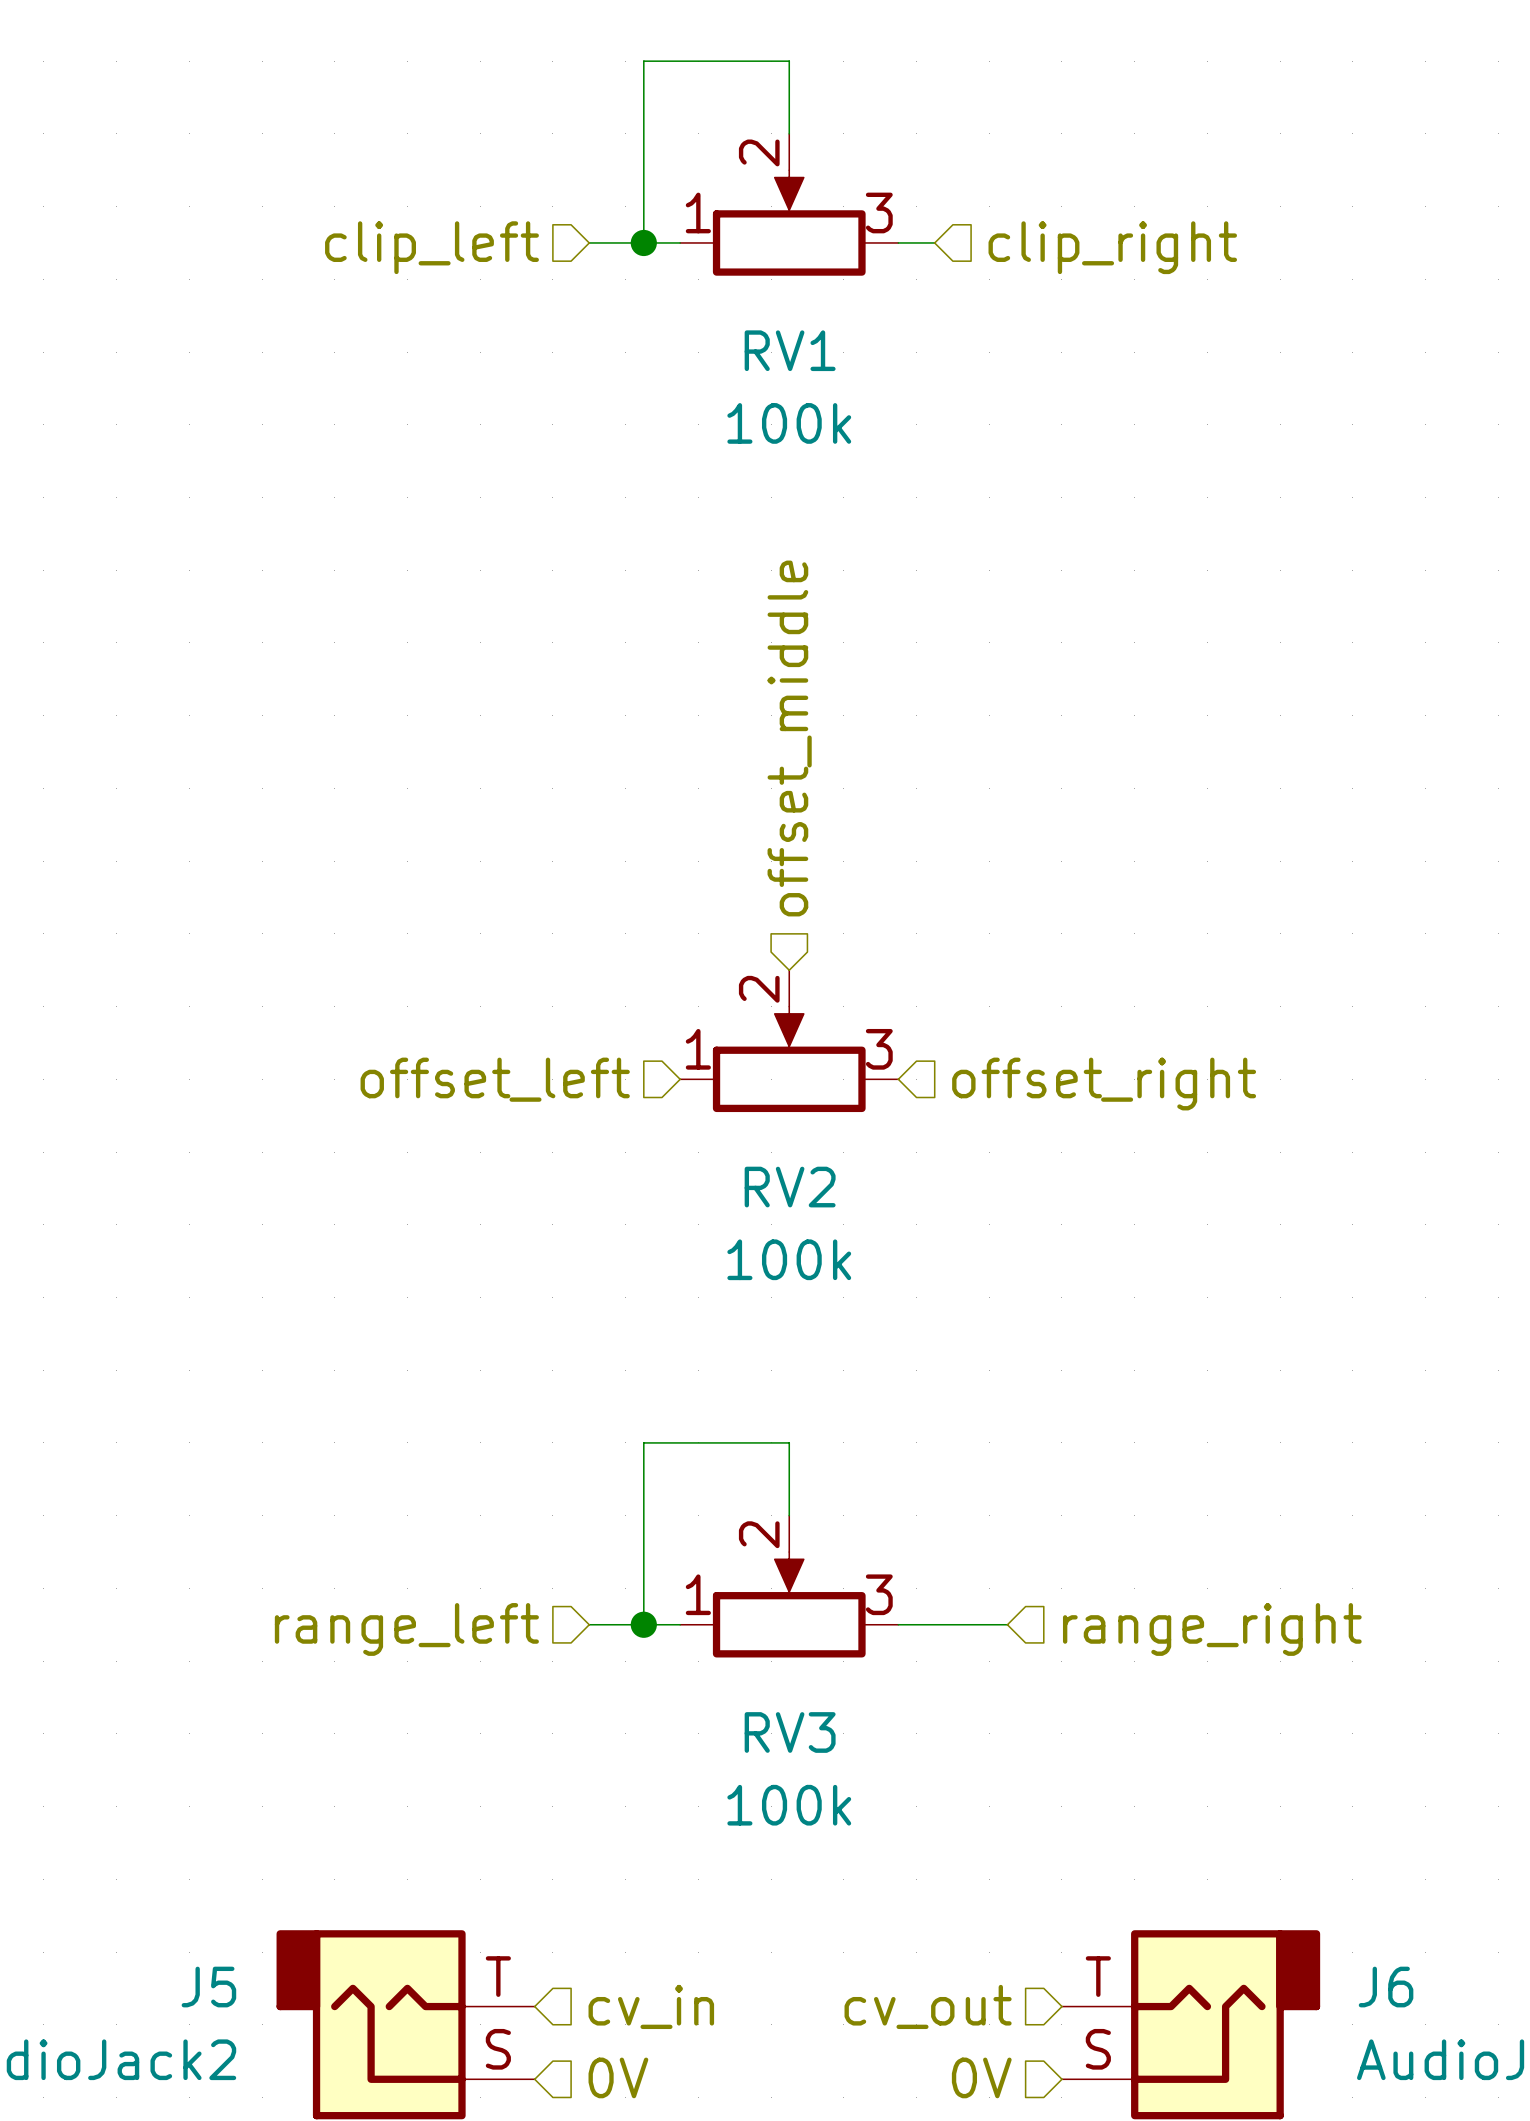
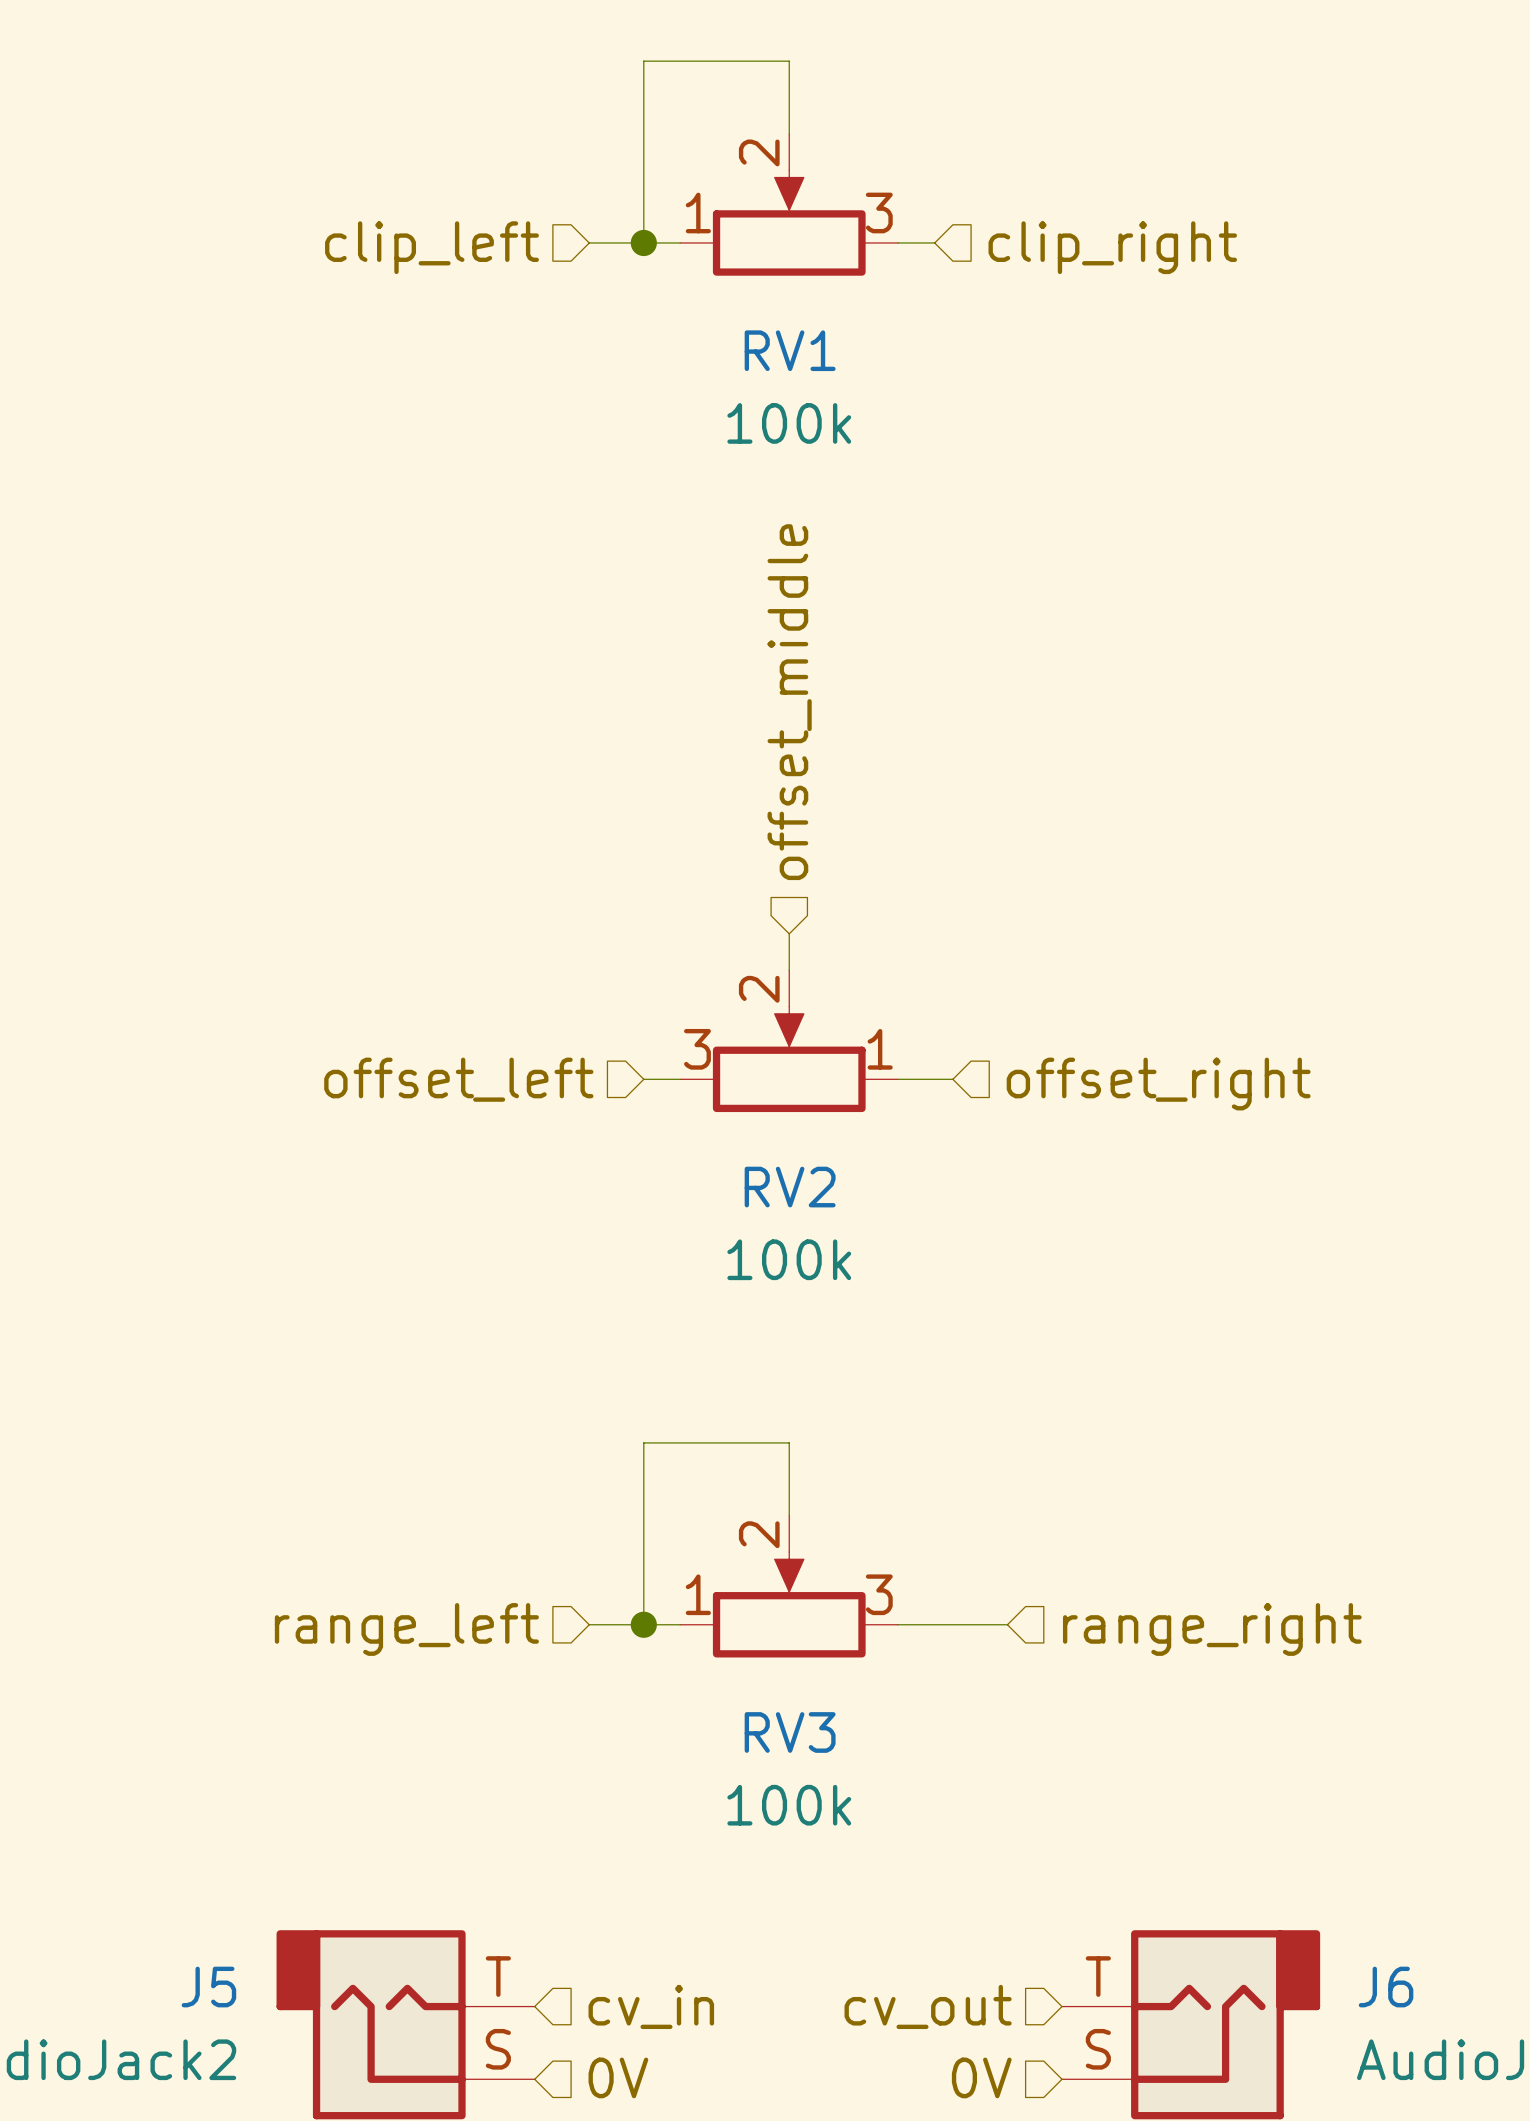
hierarchical label position: offset_middle (789, 738) -> offset_middle (789, 702)
wire: none -> (789, 933) (789, 970)
RV2 flip: as is (789, 1059) -> left-right (789, 1059)
hierarchical label position: offset_left (495, 1079) -> offset_left (458, 1079)
wire: none -> (643, 1079) (680, 1079)
wire: none -> (898, 1079) (952, 1079)
hierarchical label position: offset_right (1104, 1084) -> offset_right (1158, 1084)

